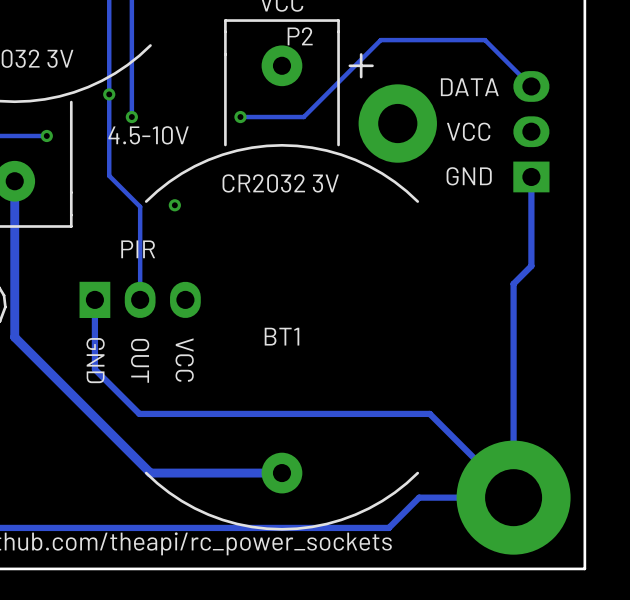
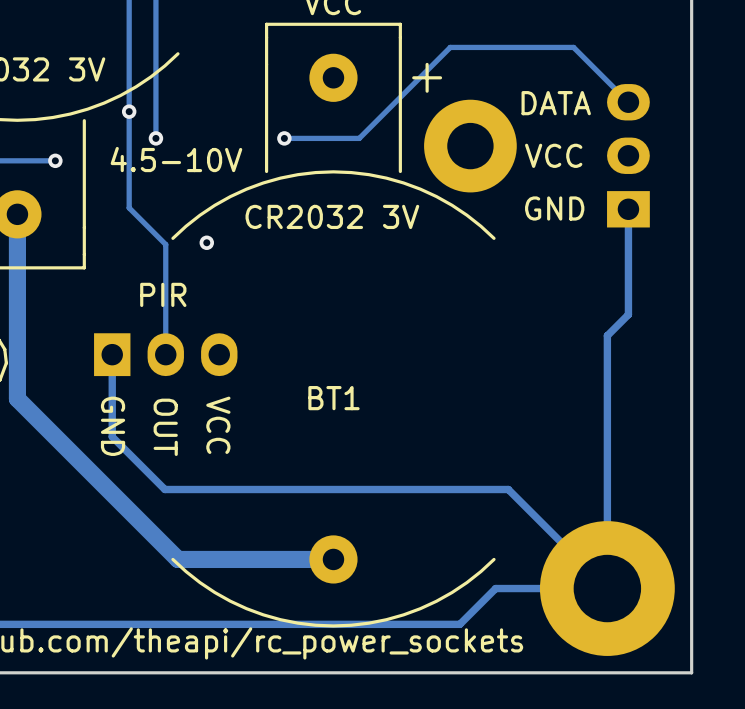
P2 name: P2 (300, 36) -> none
track width: thin (14, 181) (14, 337) (150, 473) (281, 473) -> thick (17, 214) (17, 398) (177, 559) (333, 559)

